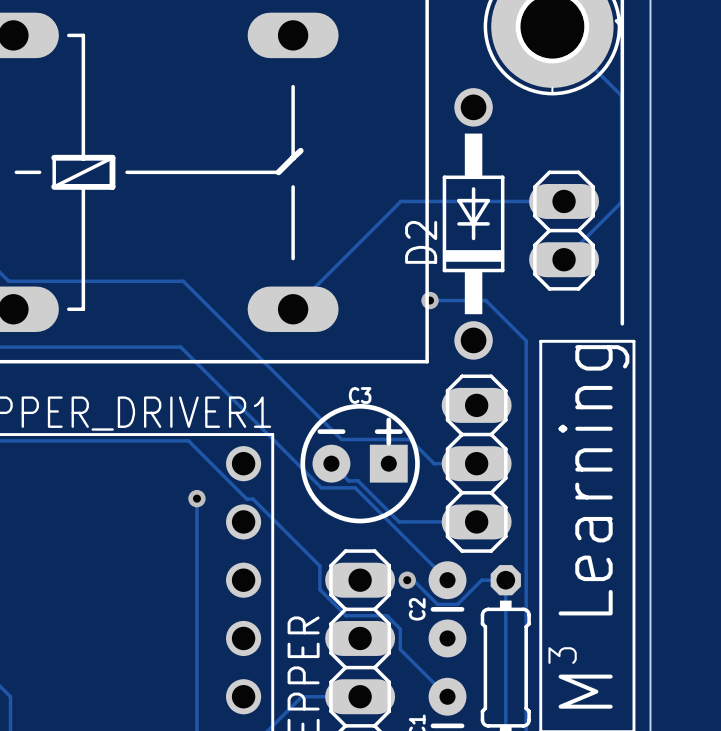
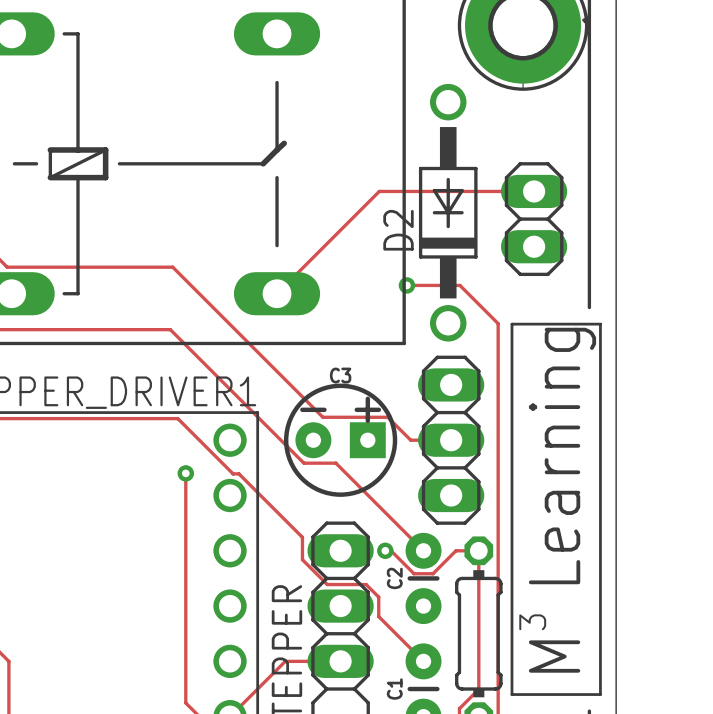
track: (552, 26) (621, 95) (621, 202) (564, 259) -> none
track: (331, 463) (348, 480) (358, 480) (399, 521) (476, 521) -> none

